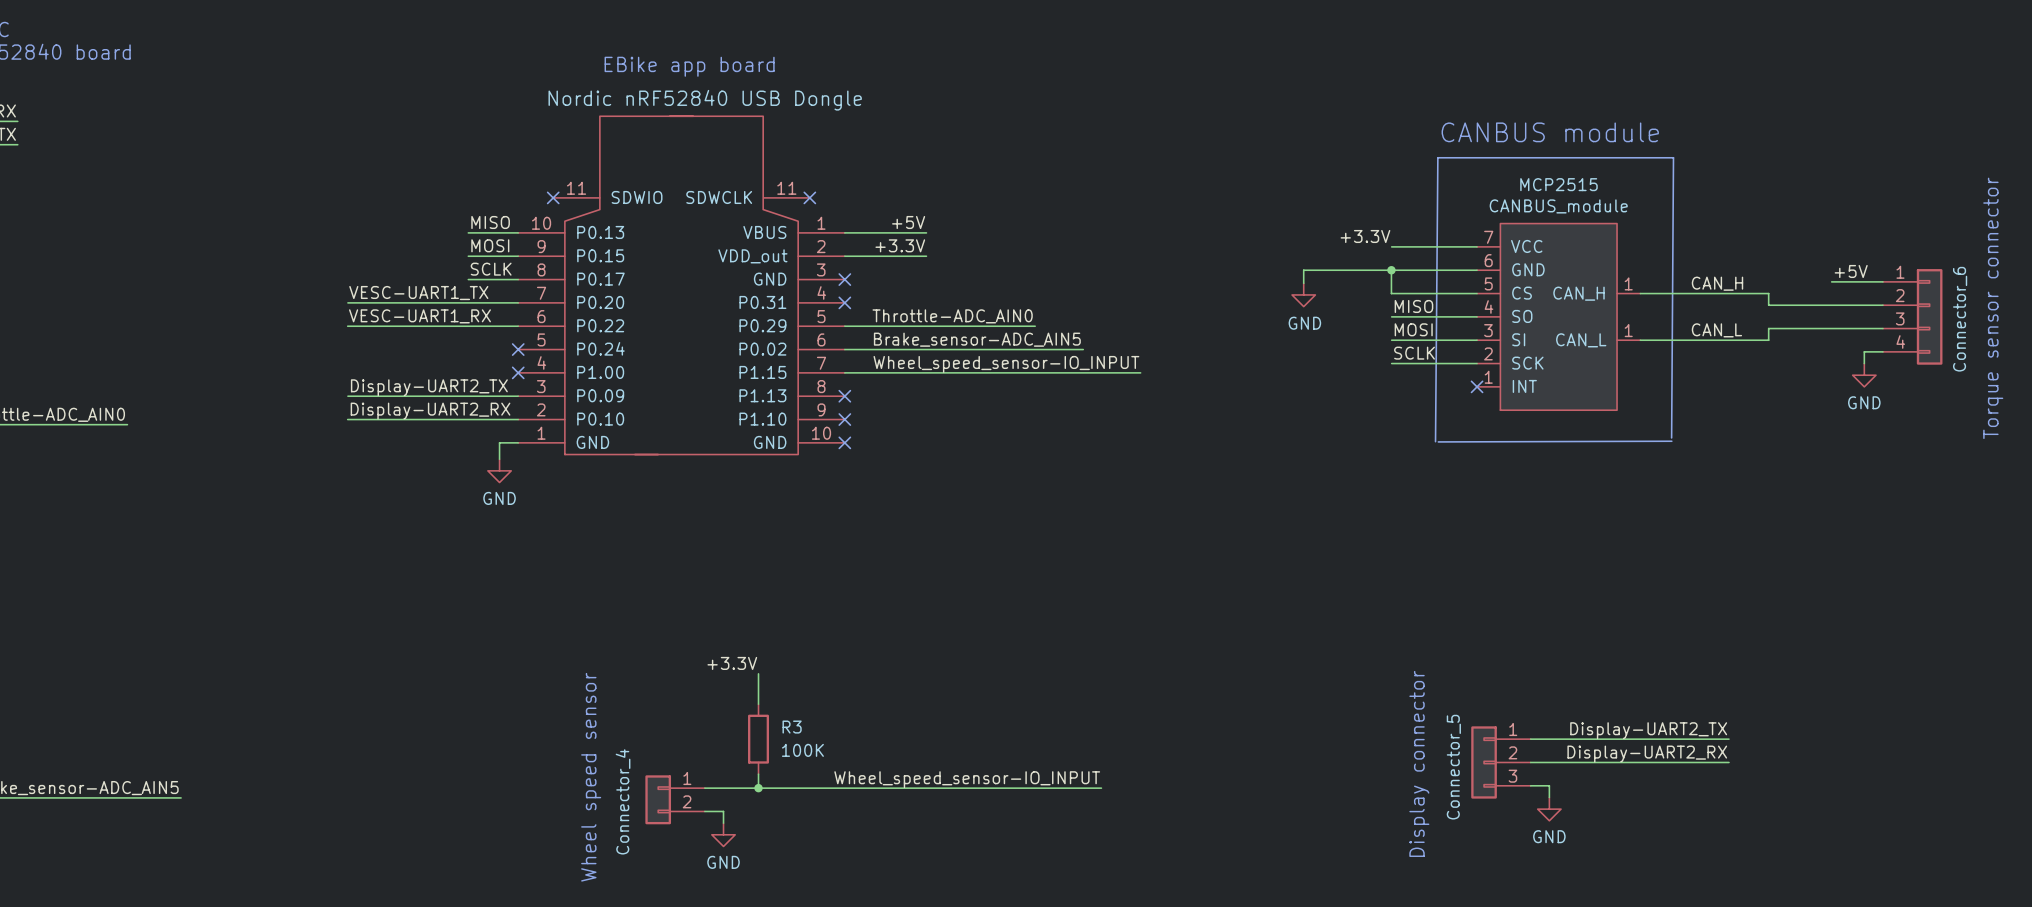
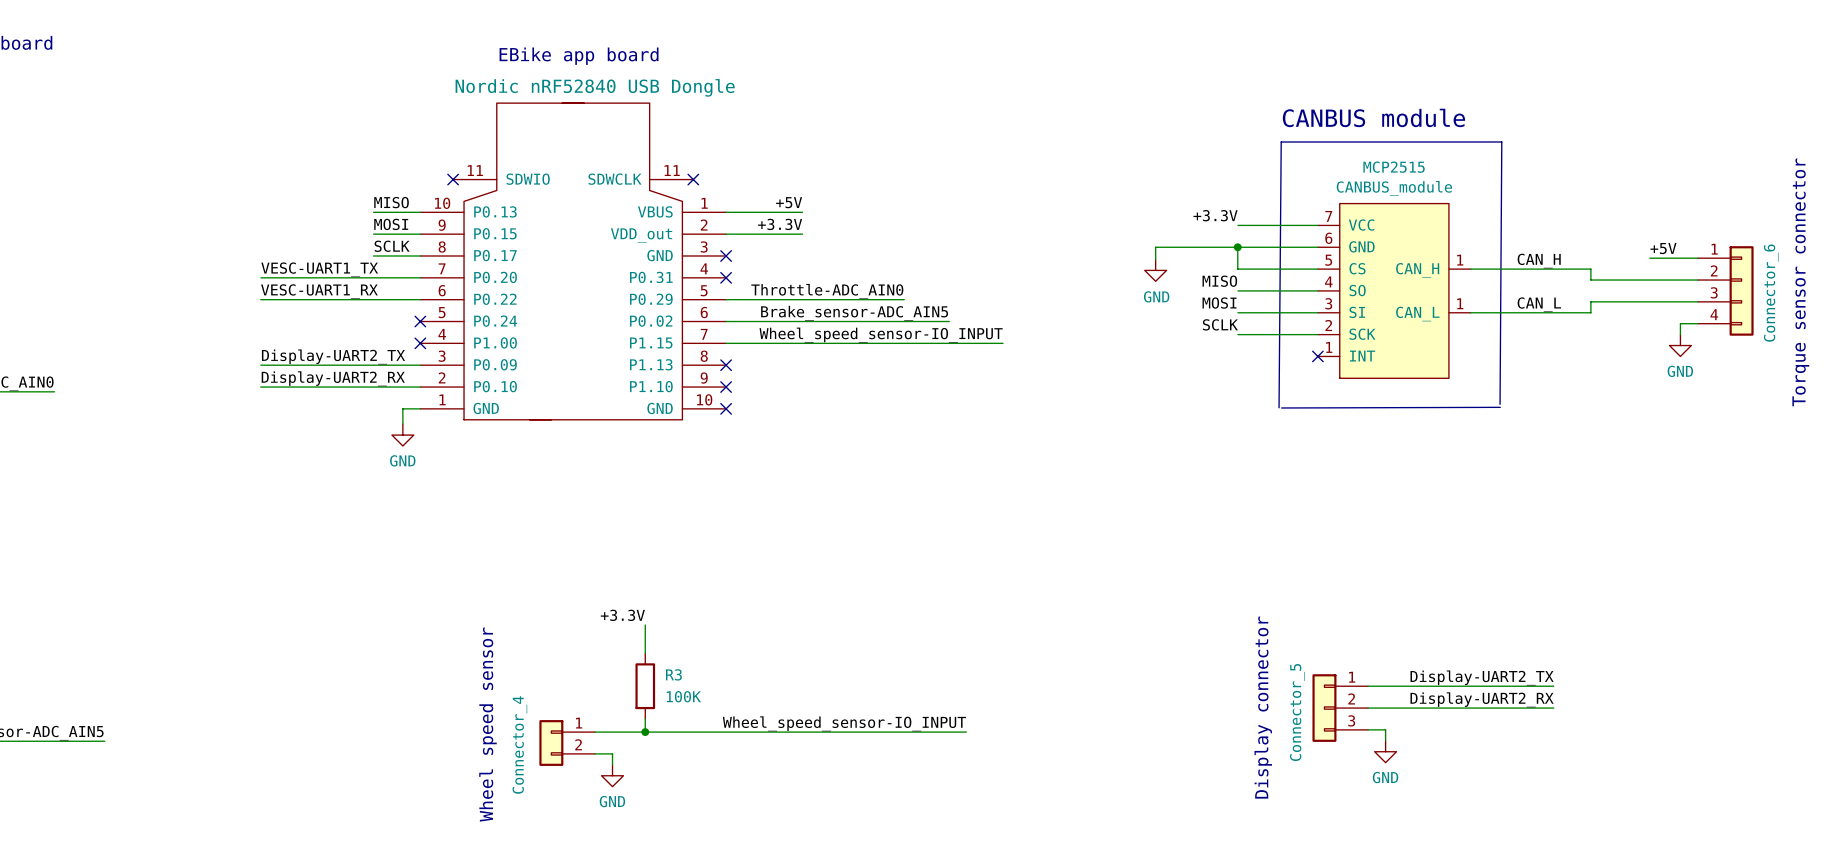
label position: MISO (1413, 306) -> MISO (1219, 281)
label position: MOSI (1413, 329) -> MOSI (1219, 303)
label position: SCLK (1414, 353) -> SCLK (1220, 324)

